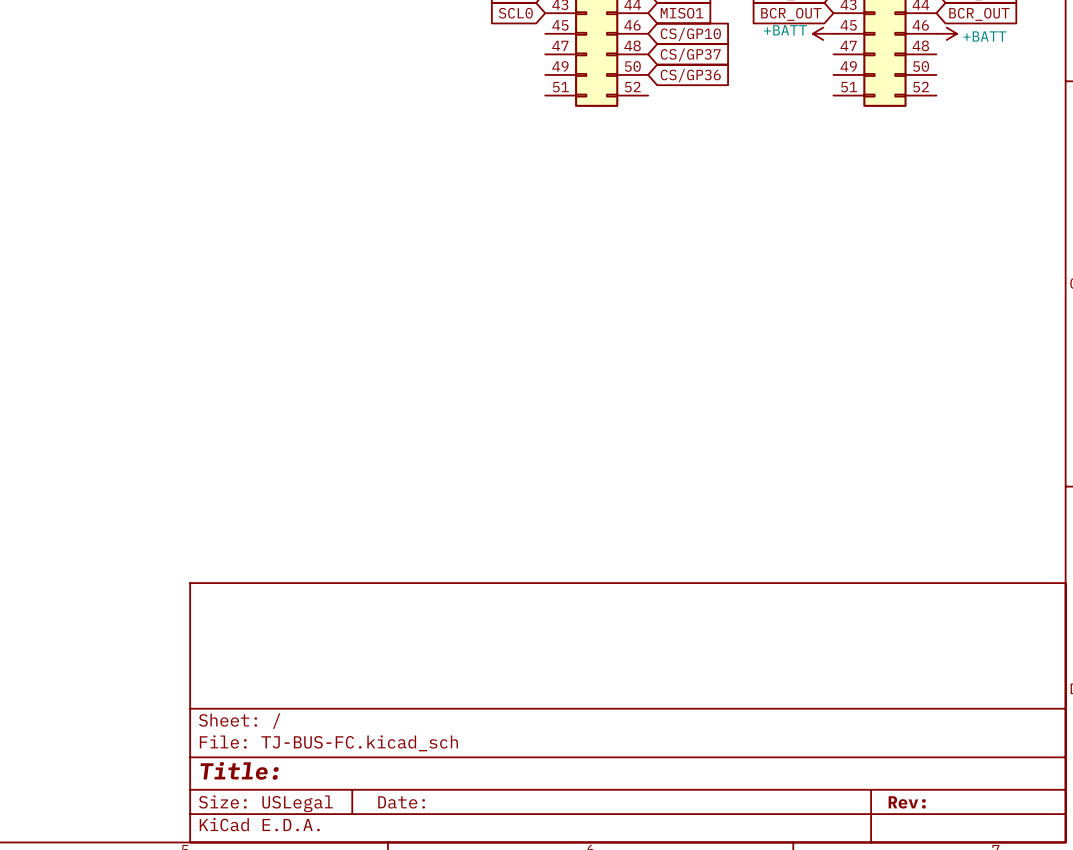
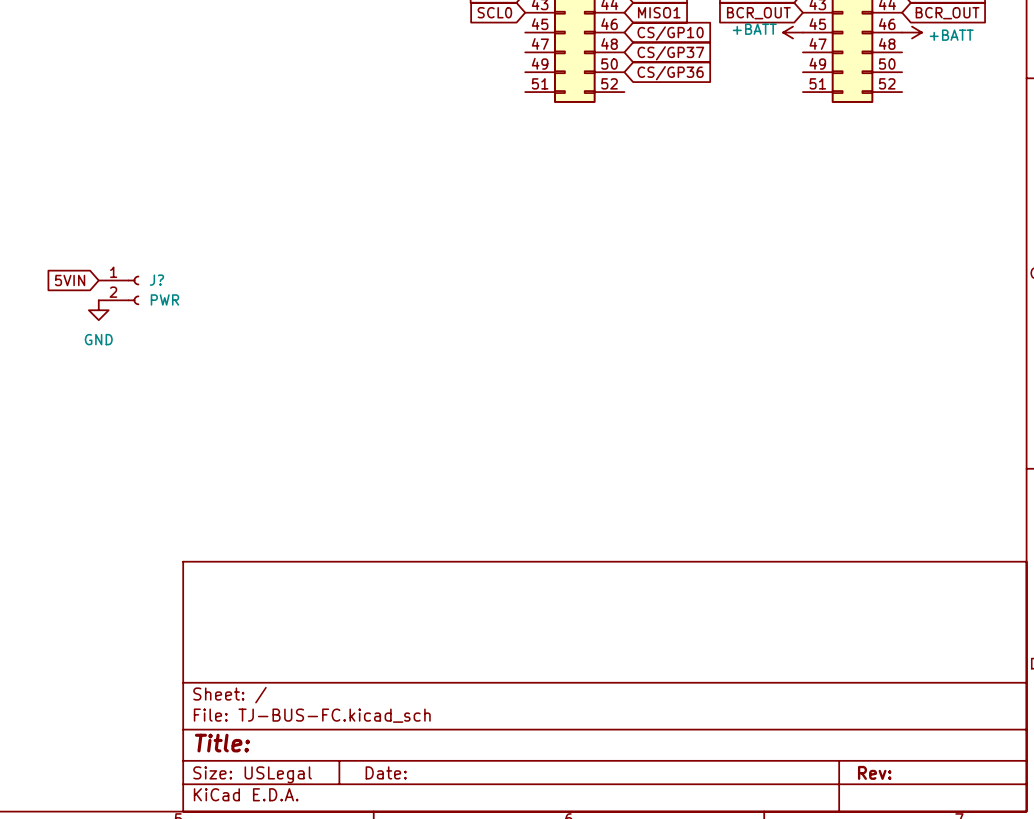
global label: none -> 5VIN (70, 280)
J?: none -> PWR (118, 290)
power symbol: none -> GND (98, 310)

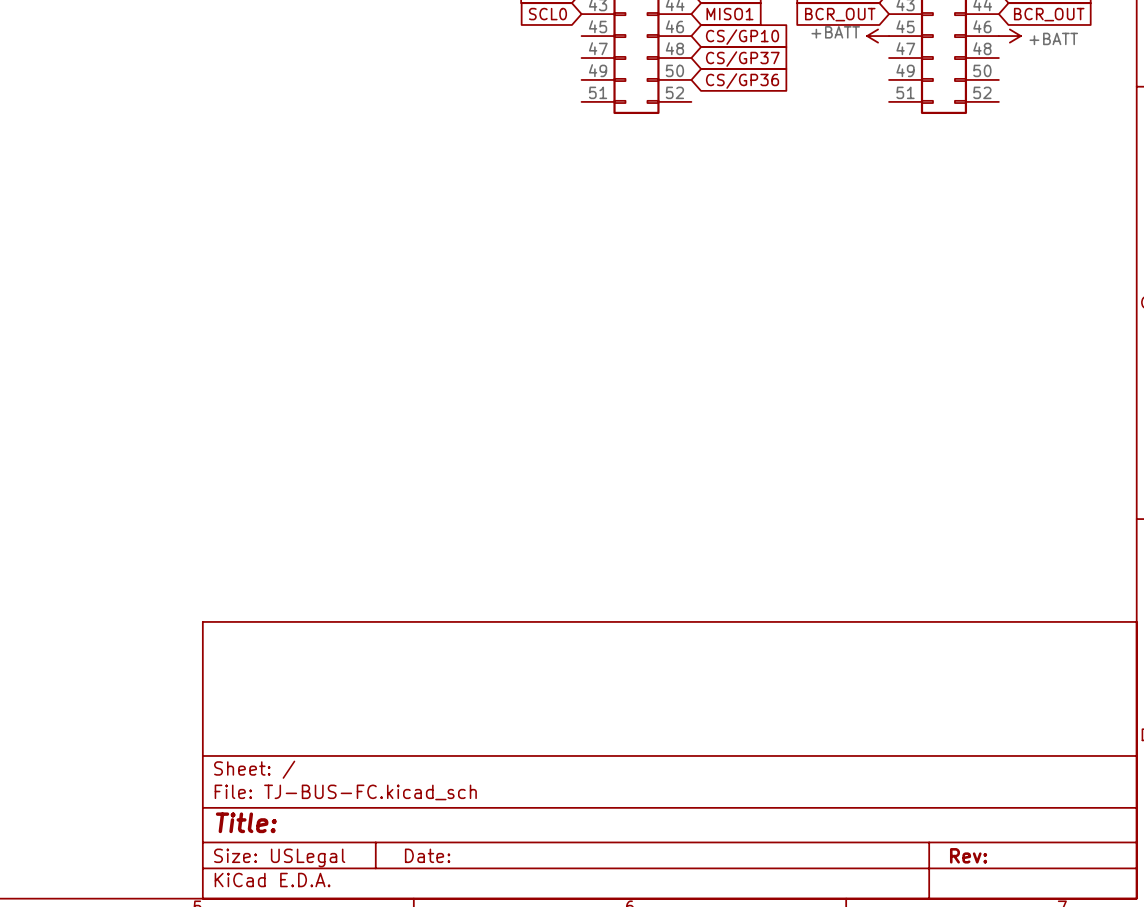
global label: 5VIN (70, 280) -> none
J?: PWR (118, 290) -> none
power symbol: GND (98, 310) -> none

